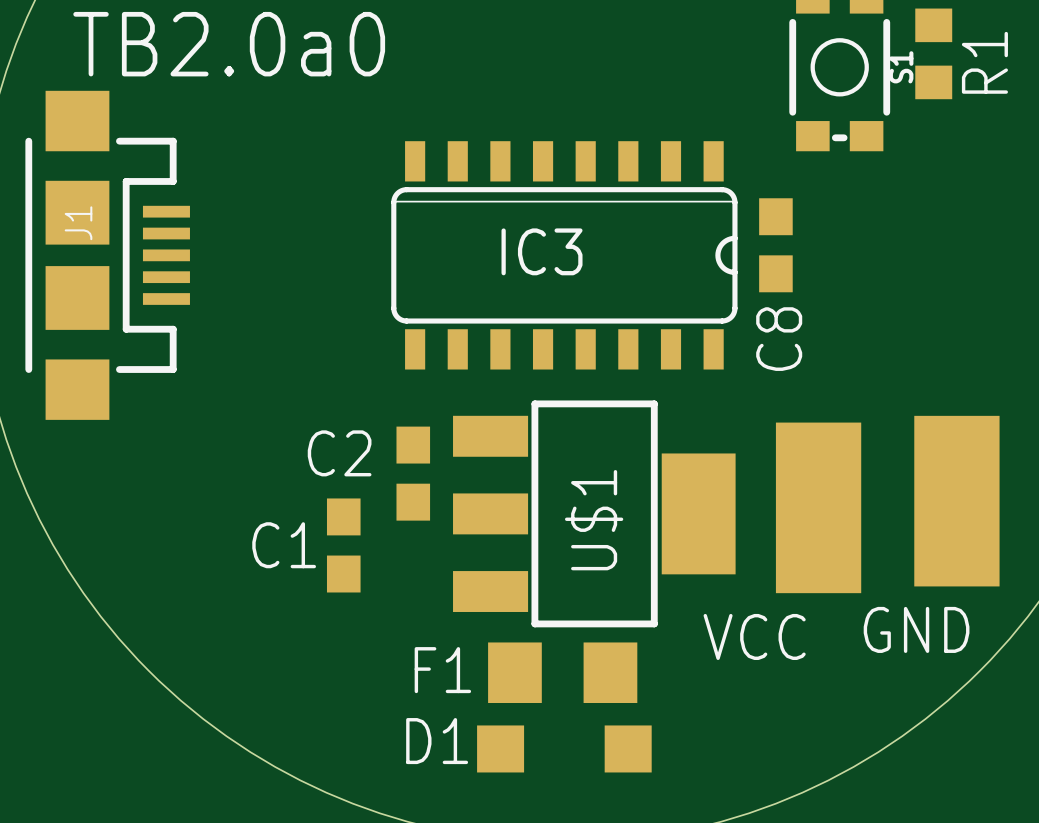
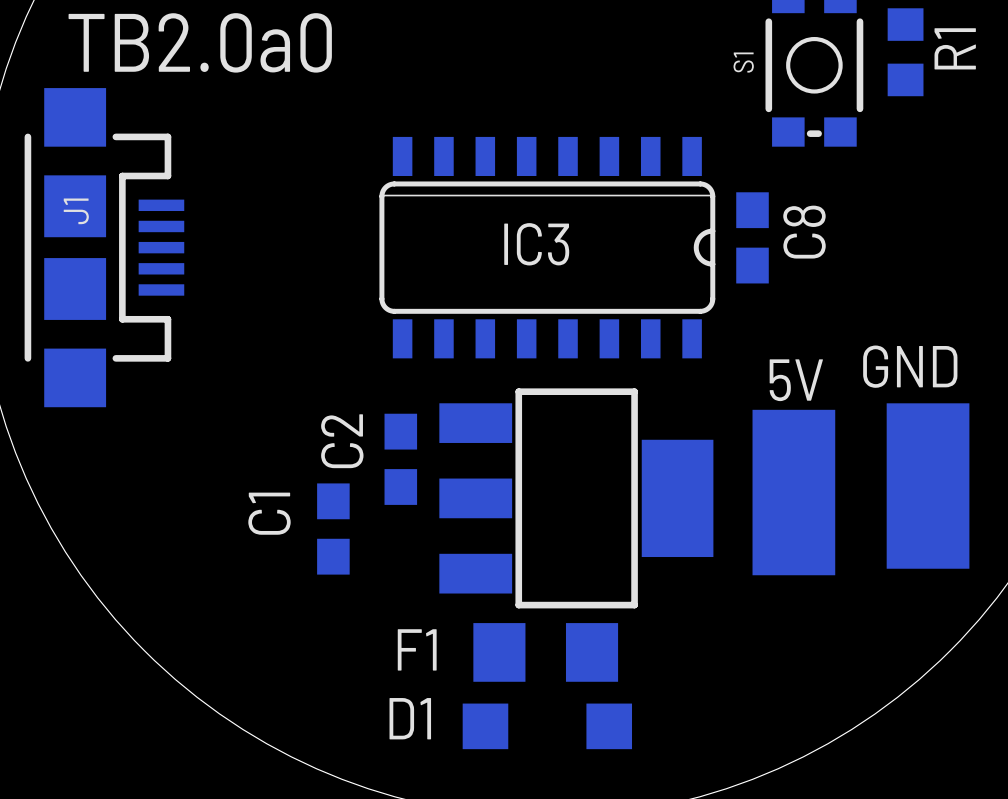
S1 name position: S1 (901, 67) -> S1 (743, 62)
C8 name position: C8 (779, 339) -> C8 (804, 232)
C2 name rotation: 0° (339, 453) -> 90° counterclockwise (342, 441)
U$1 name: U$1 (594, 520) -> none
C1 name rotation: 0° (284, 545) -> 90° counterclockwise (269, 513)
GND name position: GND (916, 629) -> GND (910, 366)
VCC name: VCC (754, 636) -> 5V (796, 380)

